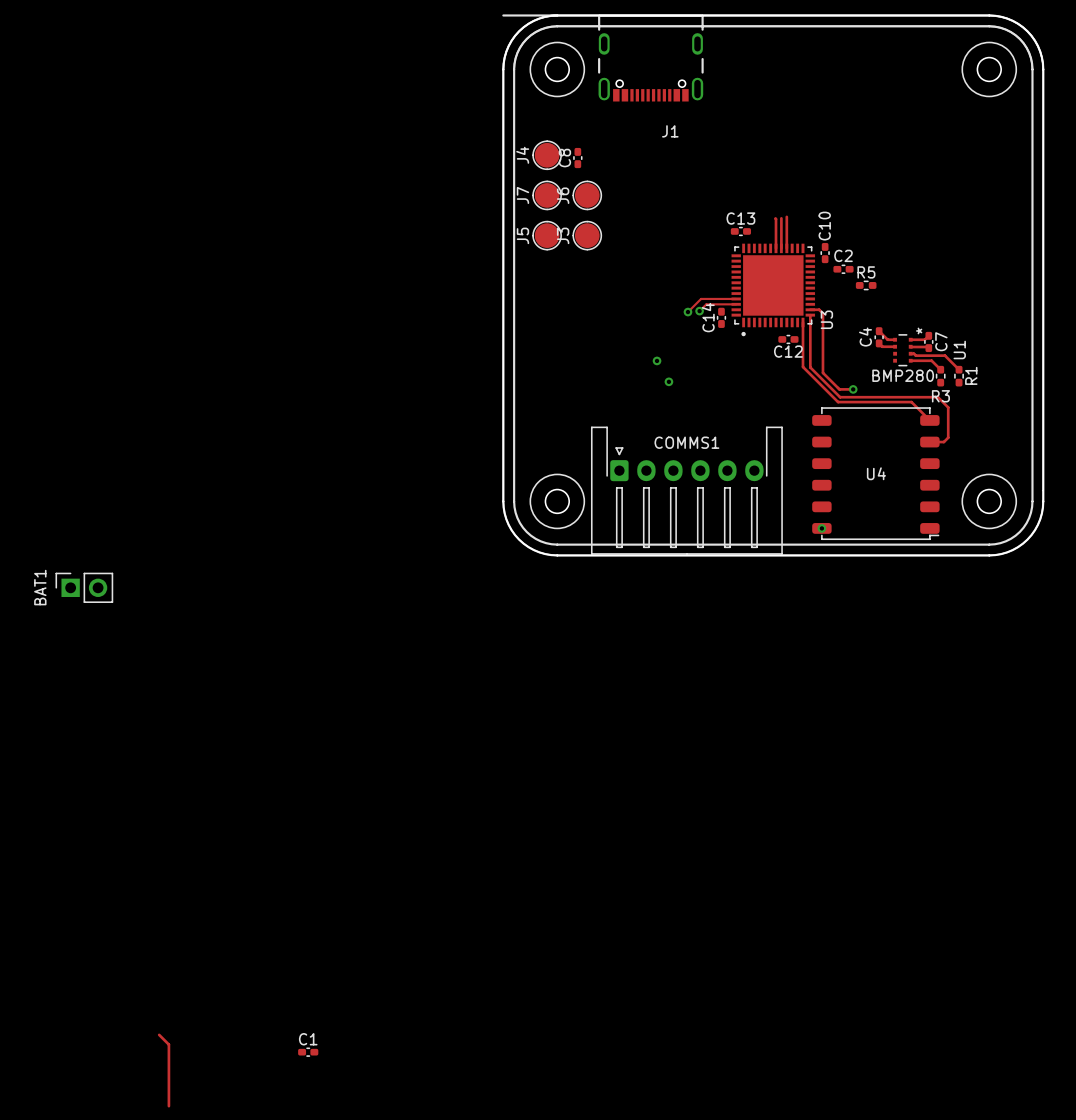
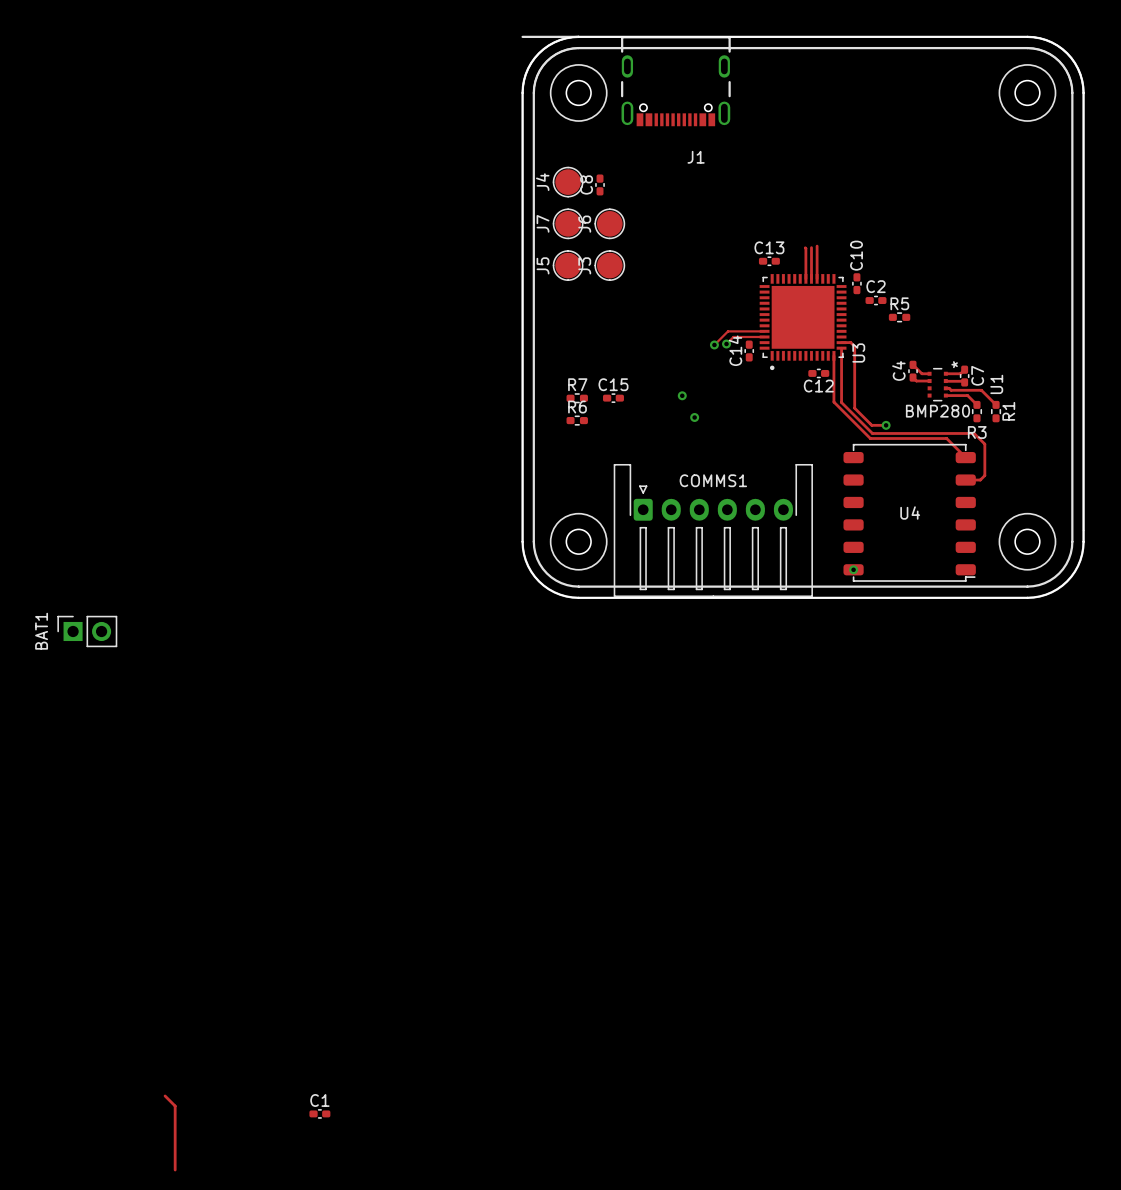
R7: none -> (577, 398)
C15: none -> (613, 398)
R6: none -> (577, 420)

